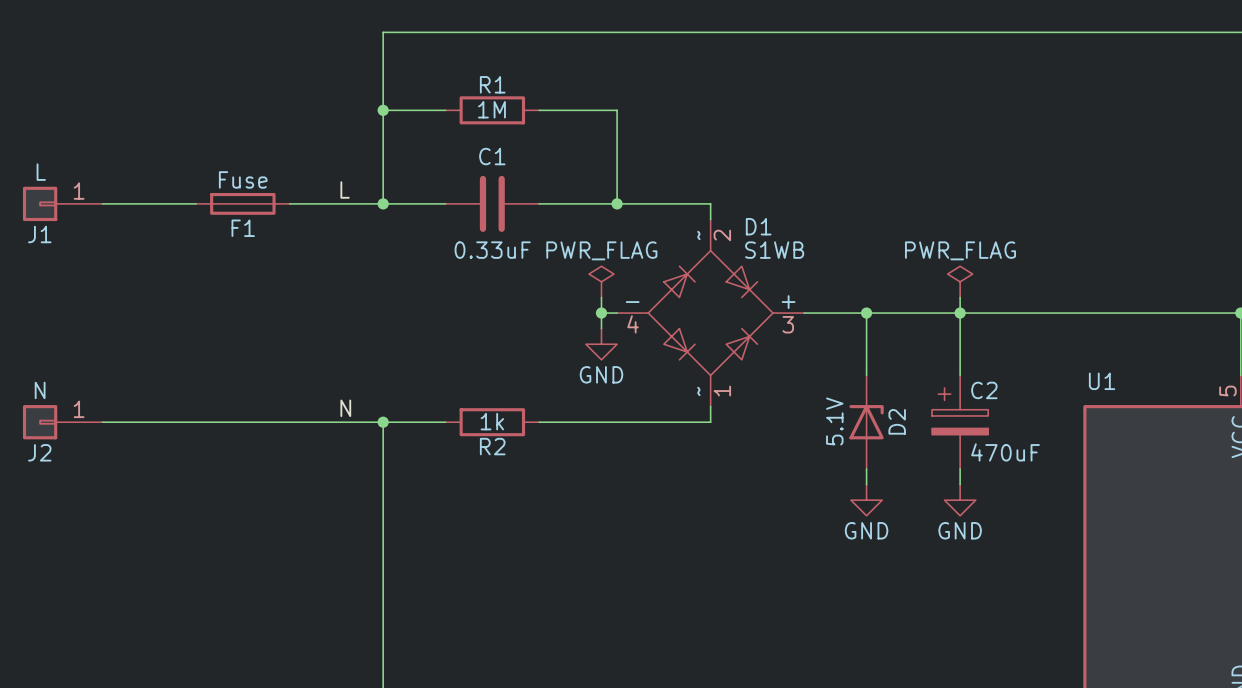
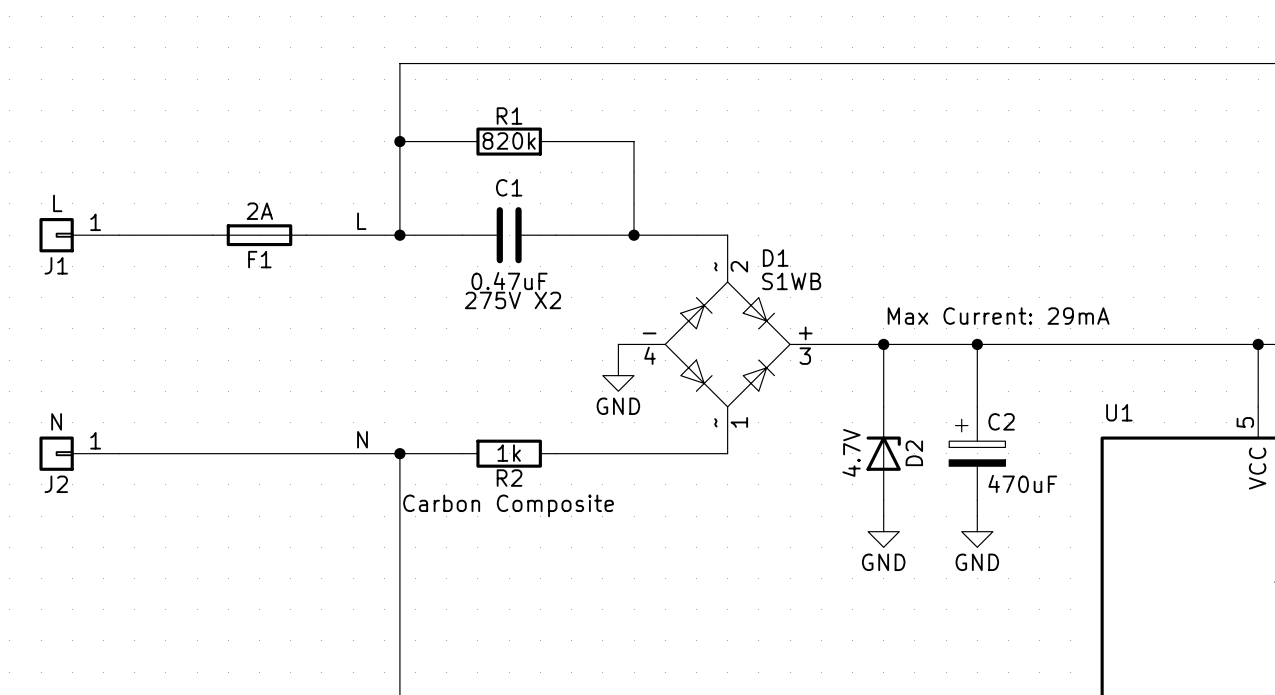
R1 value: 1M (491, 109) -> 820k (509, 140)
F1 value: Fuse (243, 179) -> 2A (259, 211)
C1 value: 0.33uF (492, 250) -> 0.47uF (509, 281)
text: none -> 275V X2 (512, 300)
power symbol: PWR_FLAG (601, 281) -> none
power symbol: PWR_FLAG (960, 281) -> none
text: none -> Max Current: 29mA (998, 316)
wire: (601, 297) (601, 313) -> none
wire: (960, 297) (960, 313) -> none
junction: (601, 313) -> none
D2 value: 5.1V (834, 421) -> 4.7V (851, 452)
text: none -> Carbon Composite (508, 505)

